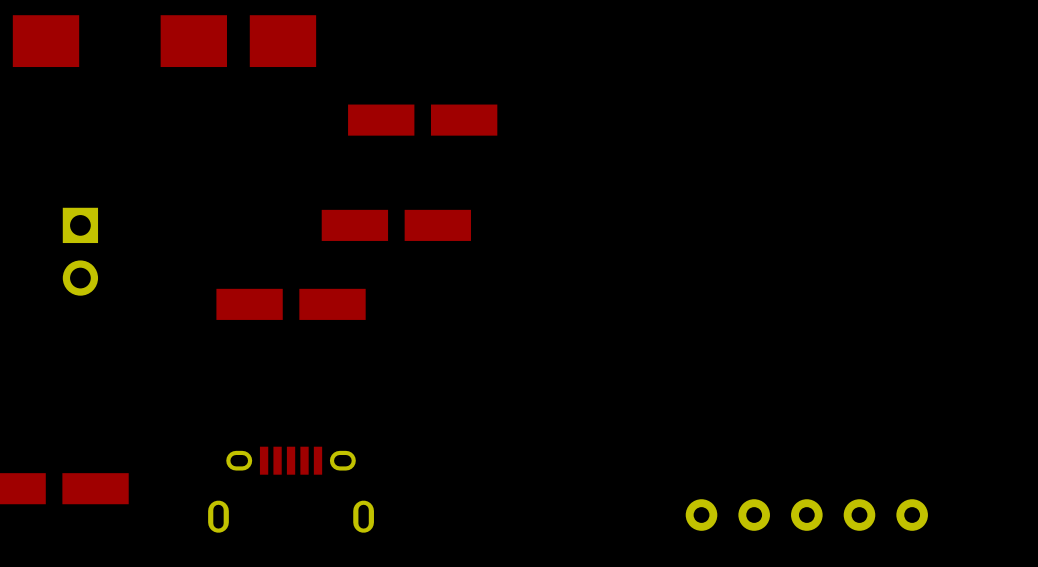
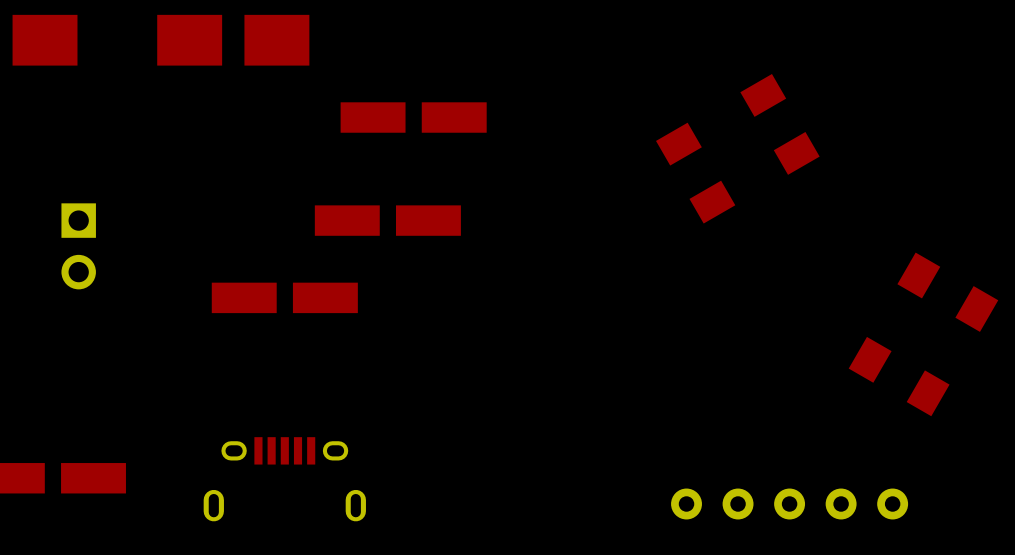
part: none -> (737, 148)
part: none -> (923, 334)

